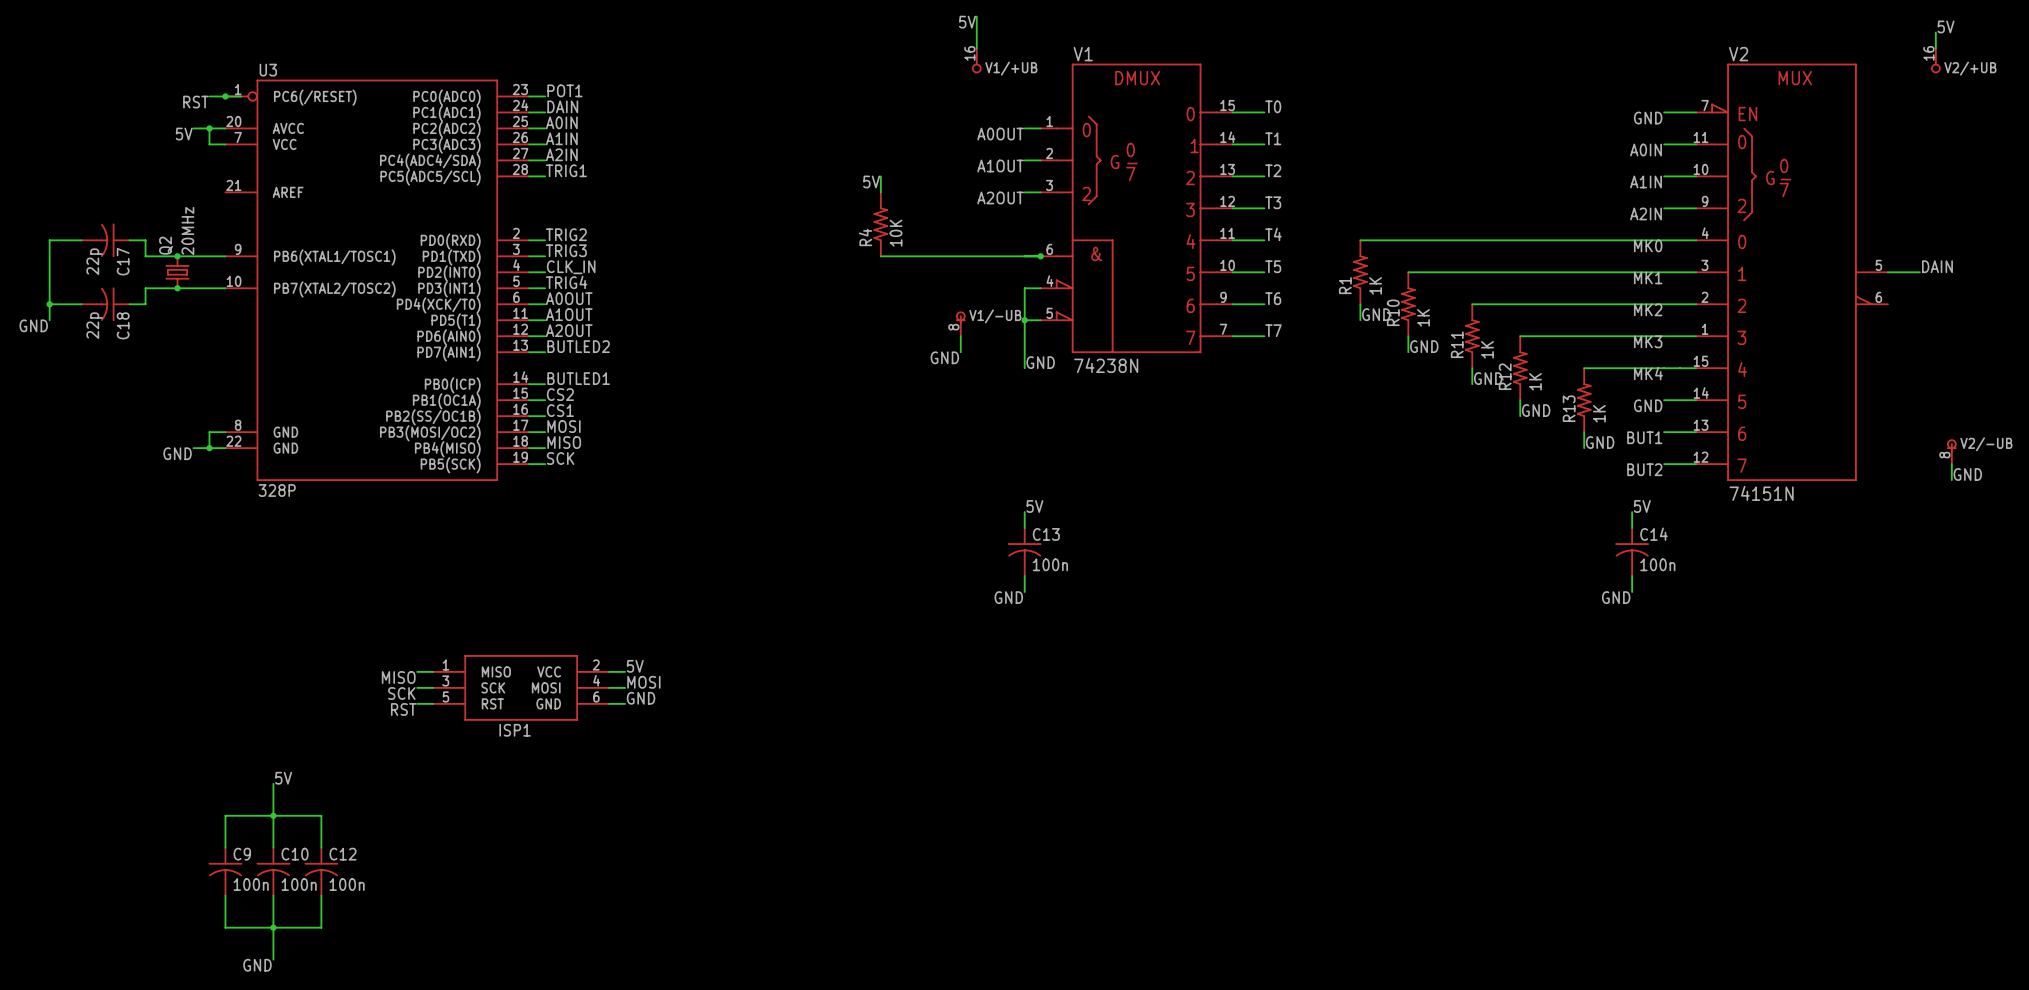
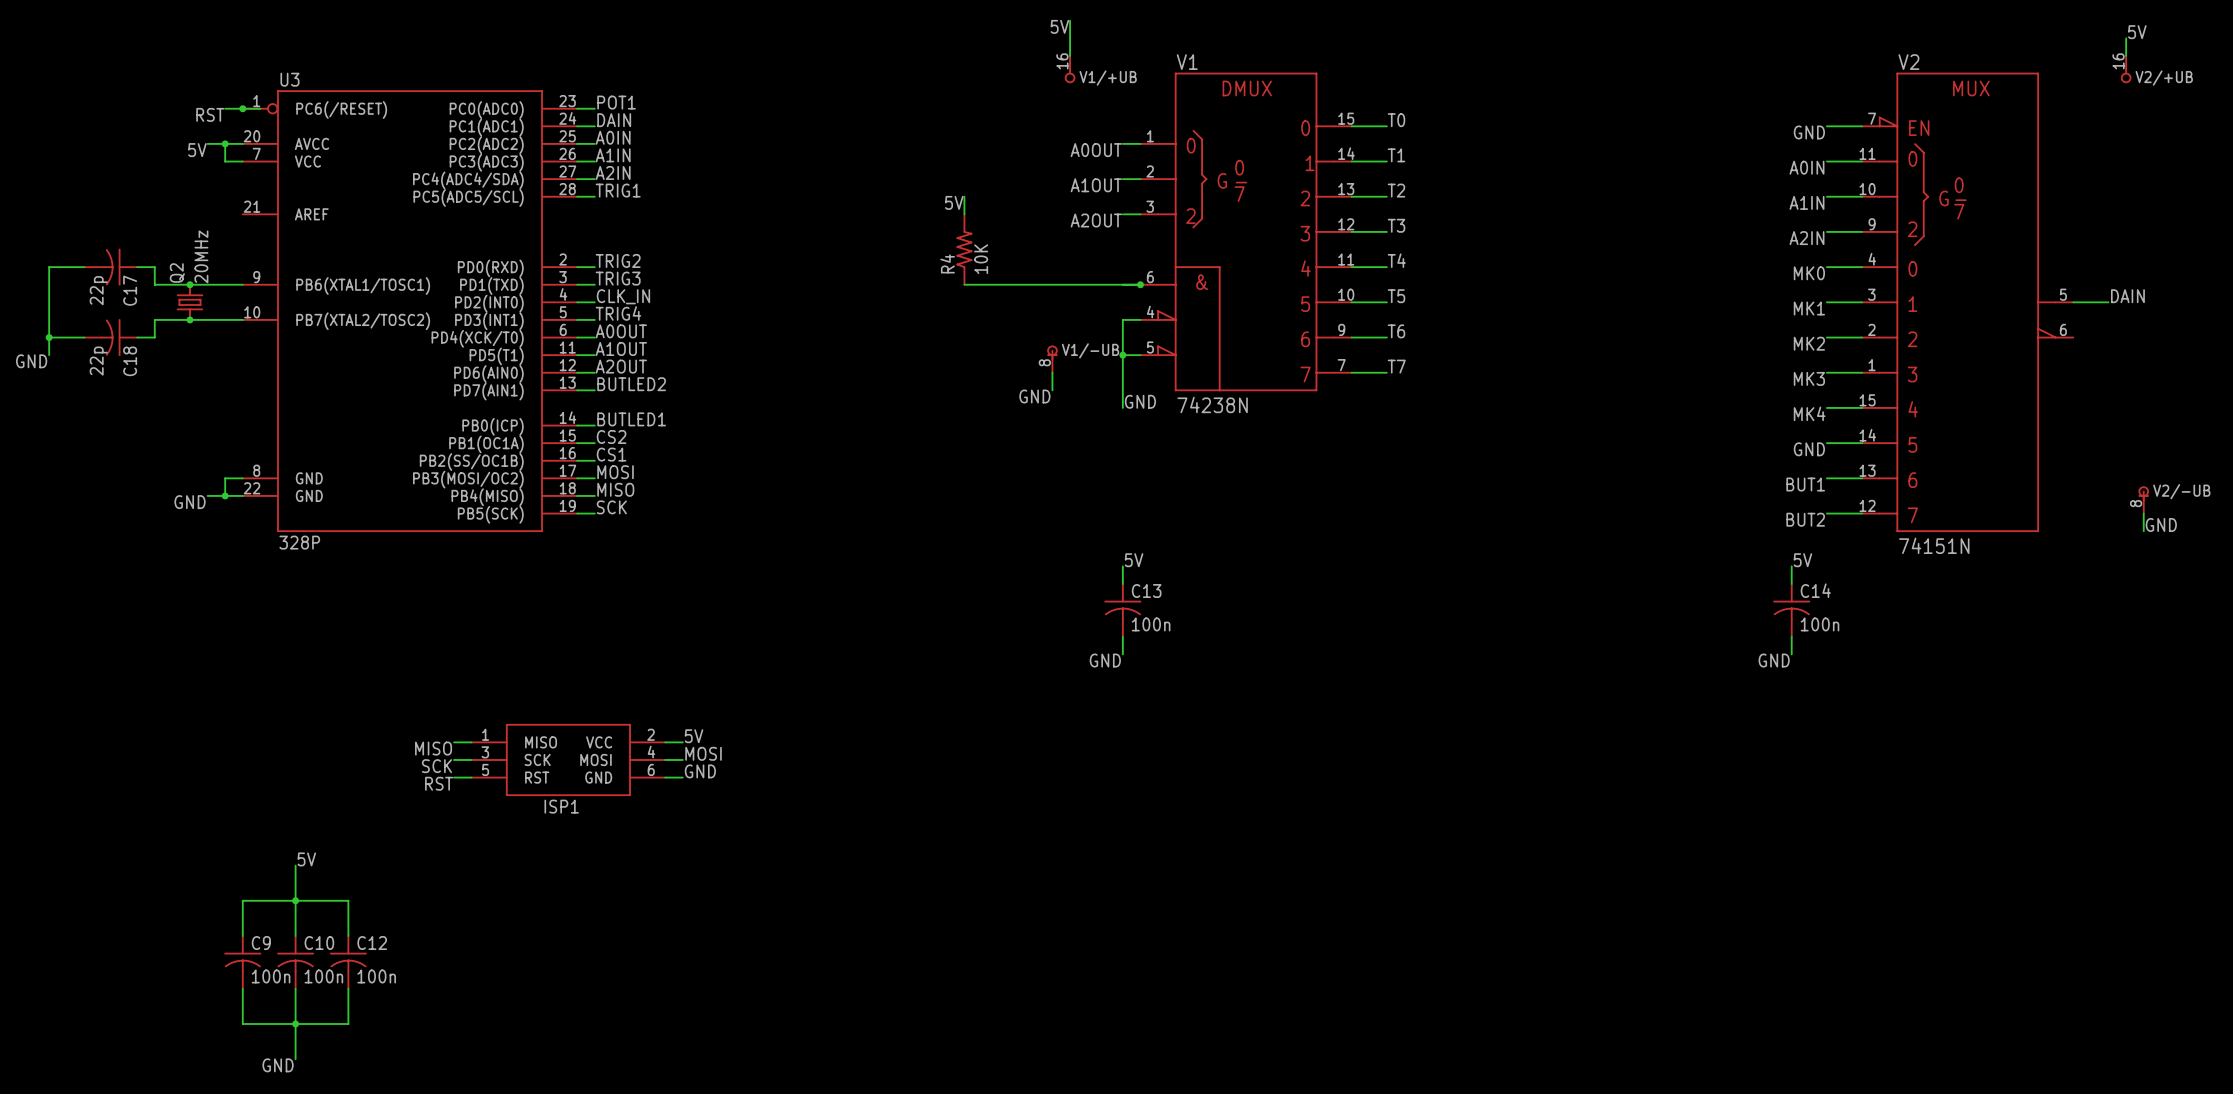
wire: (1360, 240) (1664, 240) -> none
R1: 1K (1360, 272) -> none
wire: (1408, 272) (1664, 272) -> none
wire: (1360, 304) (1360, 320) -> none
R10: 1K (1408, 304) -> none
wire: (1472, 304) (1664, 304) -> none
label: GND (1376, 314) -> none
wire: (1408, 336) (1408, 352) -> none
R11: 1K (1472, 336) -> none
wire: (1520, 336) (1664, 336) -> none
label: GND (1424, 346) -> none
wire: (1472, 368) (1472, 384) -> none
R12: 1K (1520, 368) -> none
wire: (1584, 368) (1664, 368) -> none
label: GND (1488, 378) -> none
wire: (1520, 400) (1520, 416) -> none
R13: 1K (1584, 400) -> none
label: GND (1536, 410) -> none
wire: (1584, 432) (1584, 448) -> none
label: GND (1600, 442) -> none

